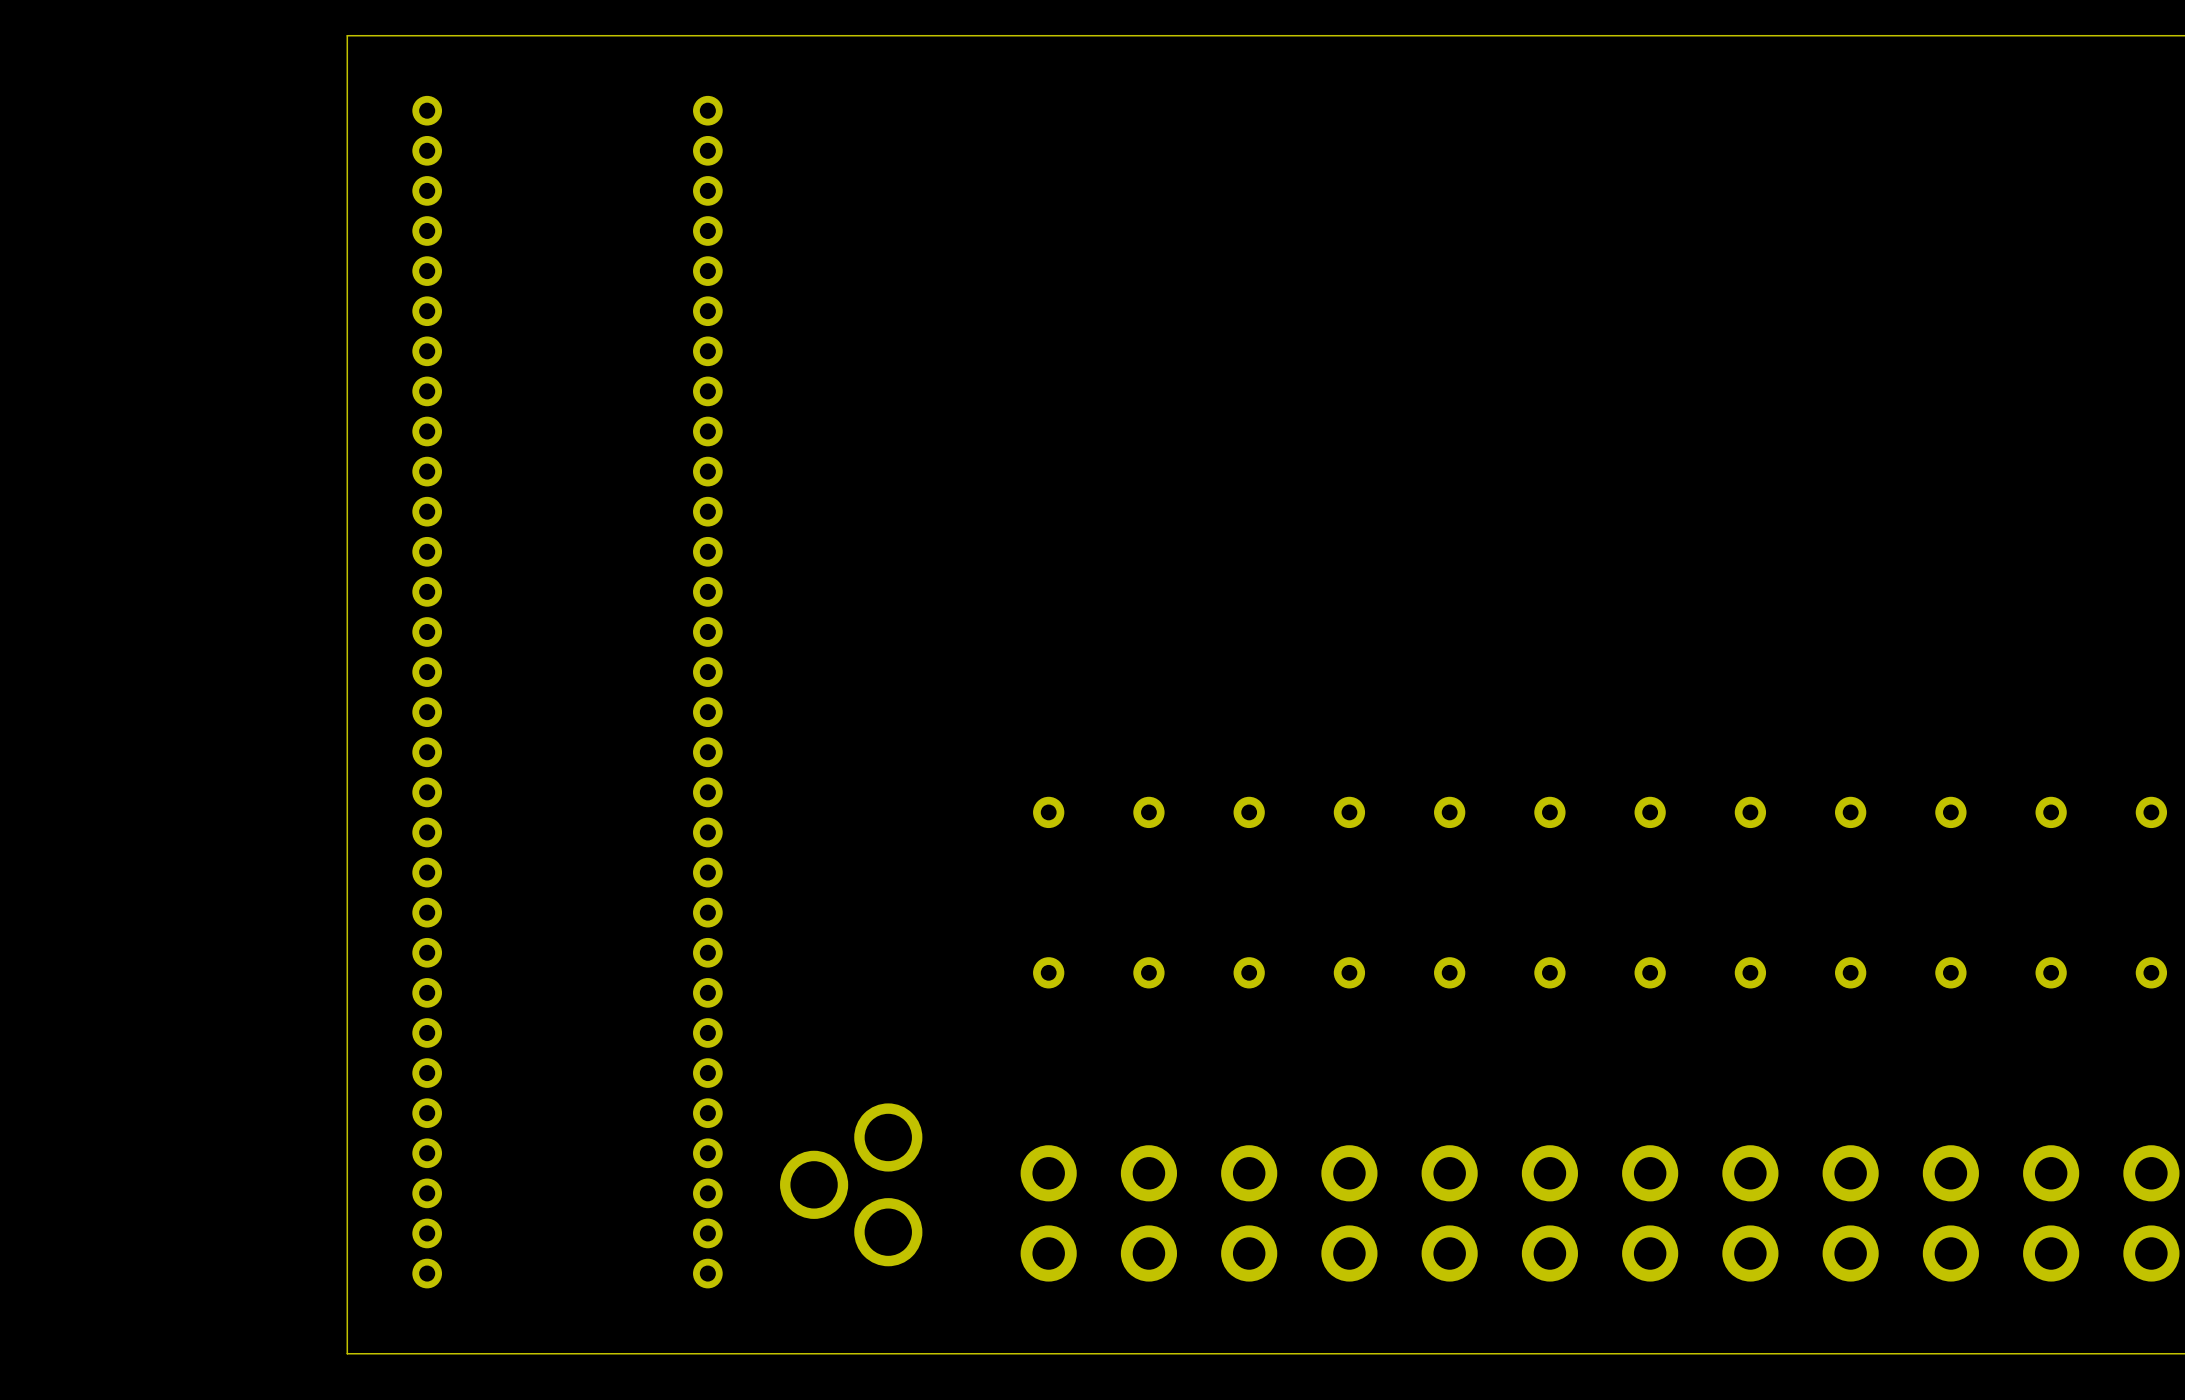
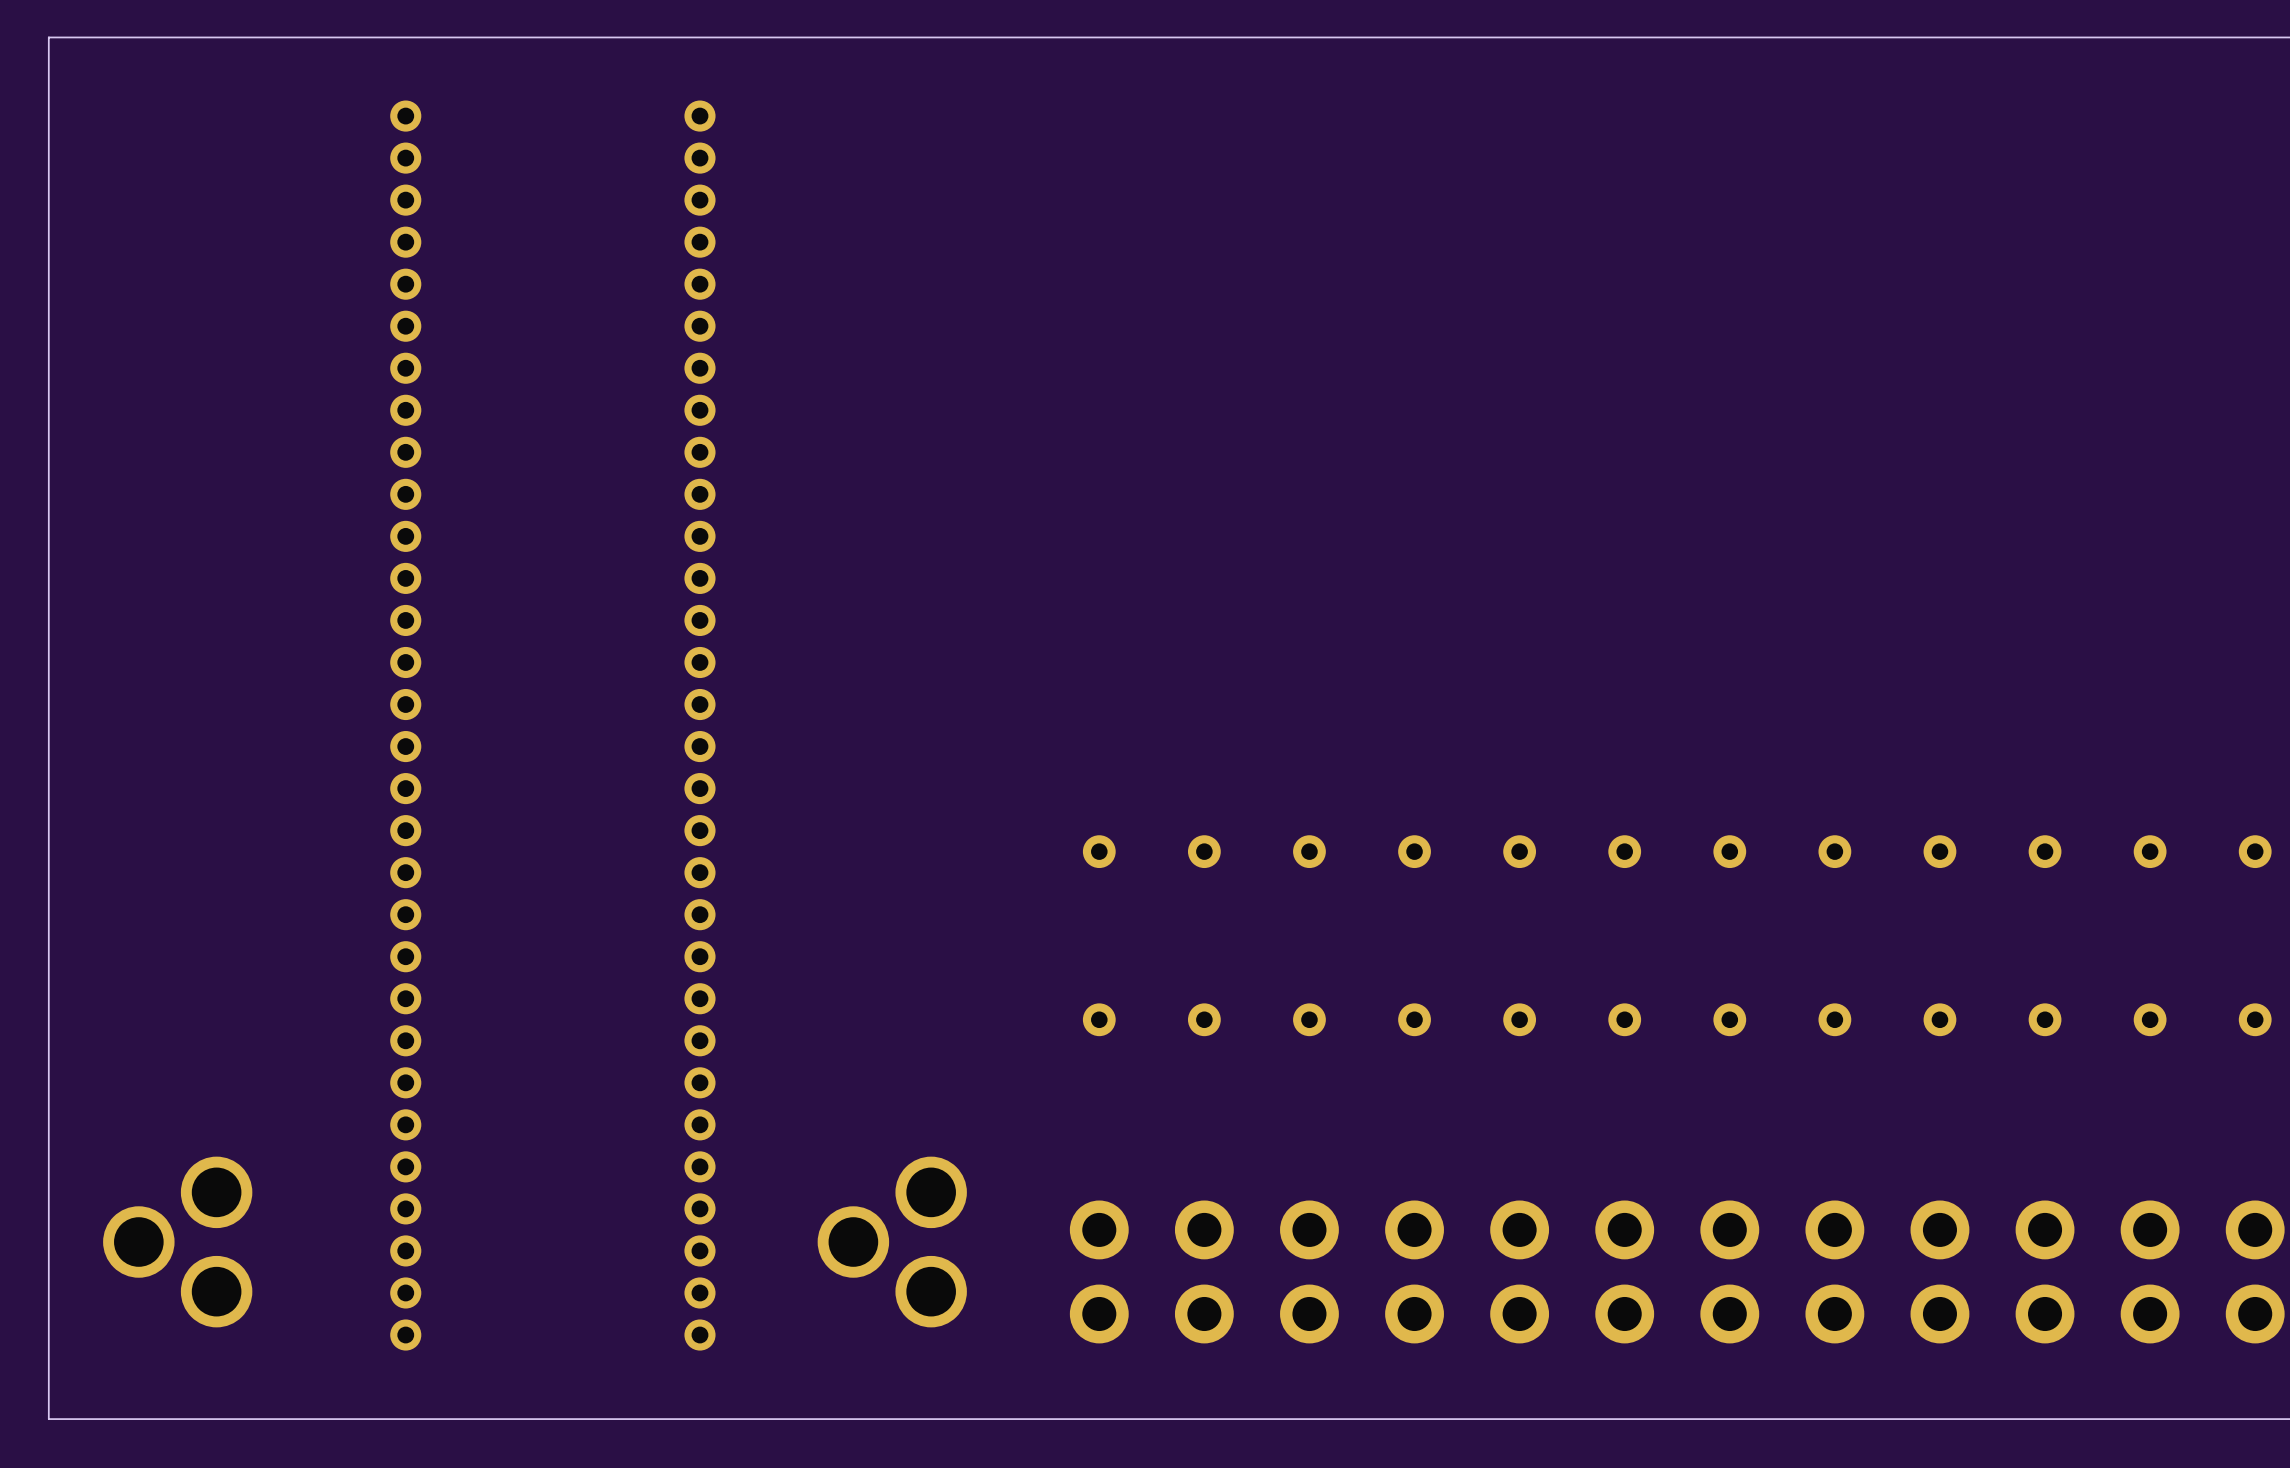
board edge: (347, 35) (347, 1353) -> (364, 37) (48, 37) (48, 1419) (364, 1419)
part position: (427, 692) -> (405, 725)
part position: (707, 692) -> (699, 725)
part: none -> (177, 1242)

